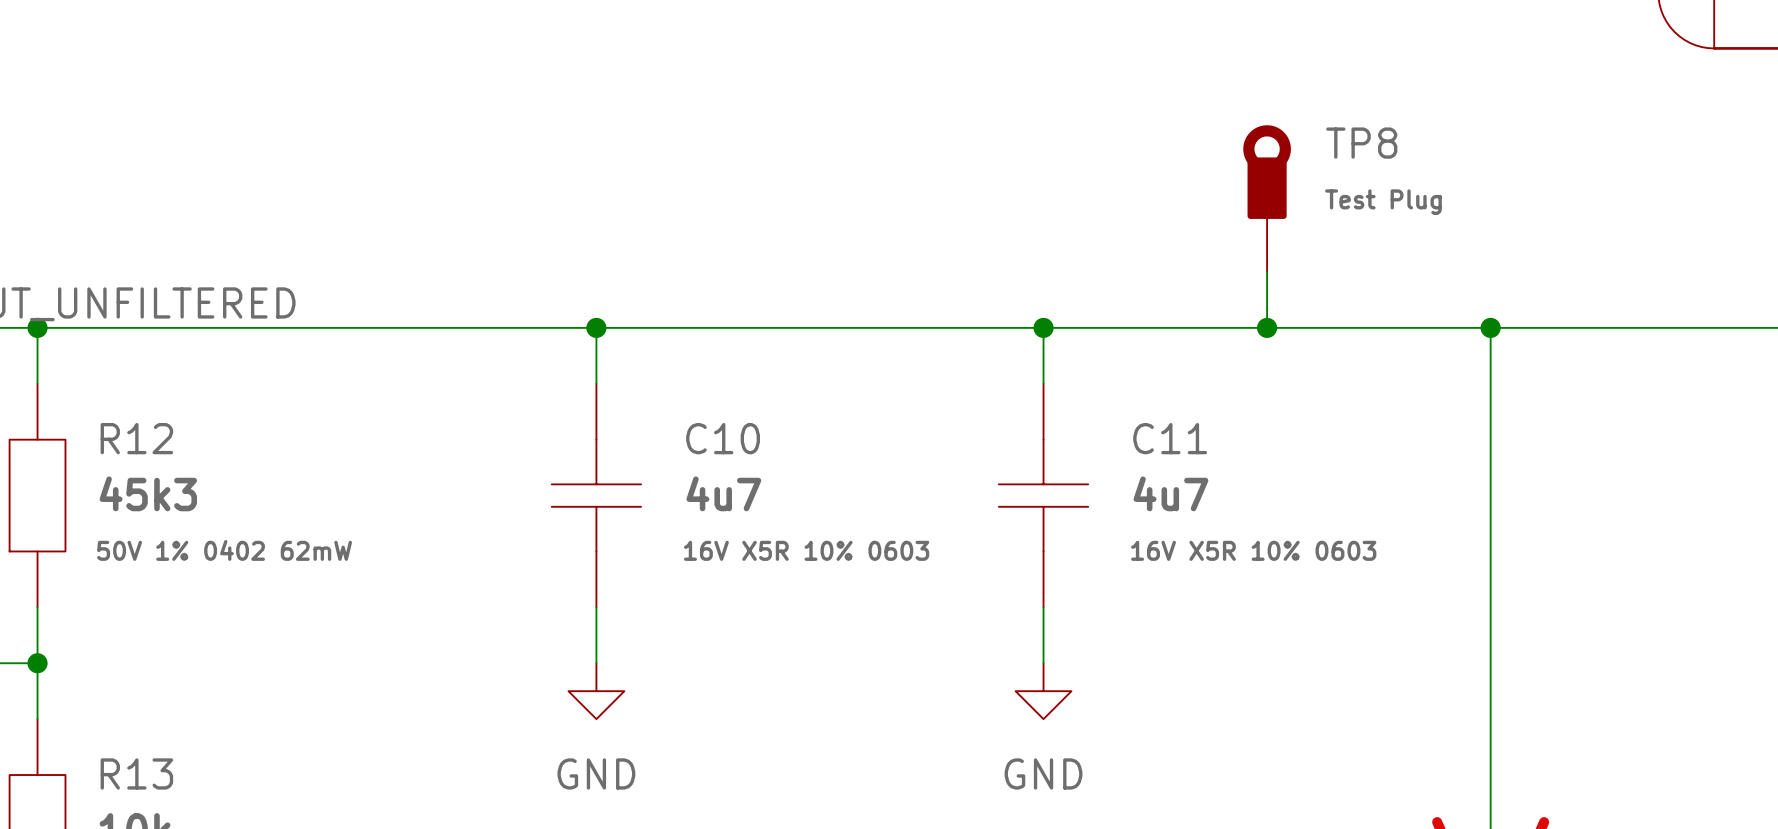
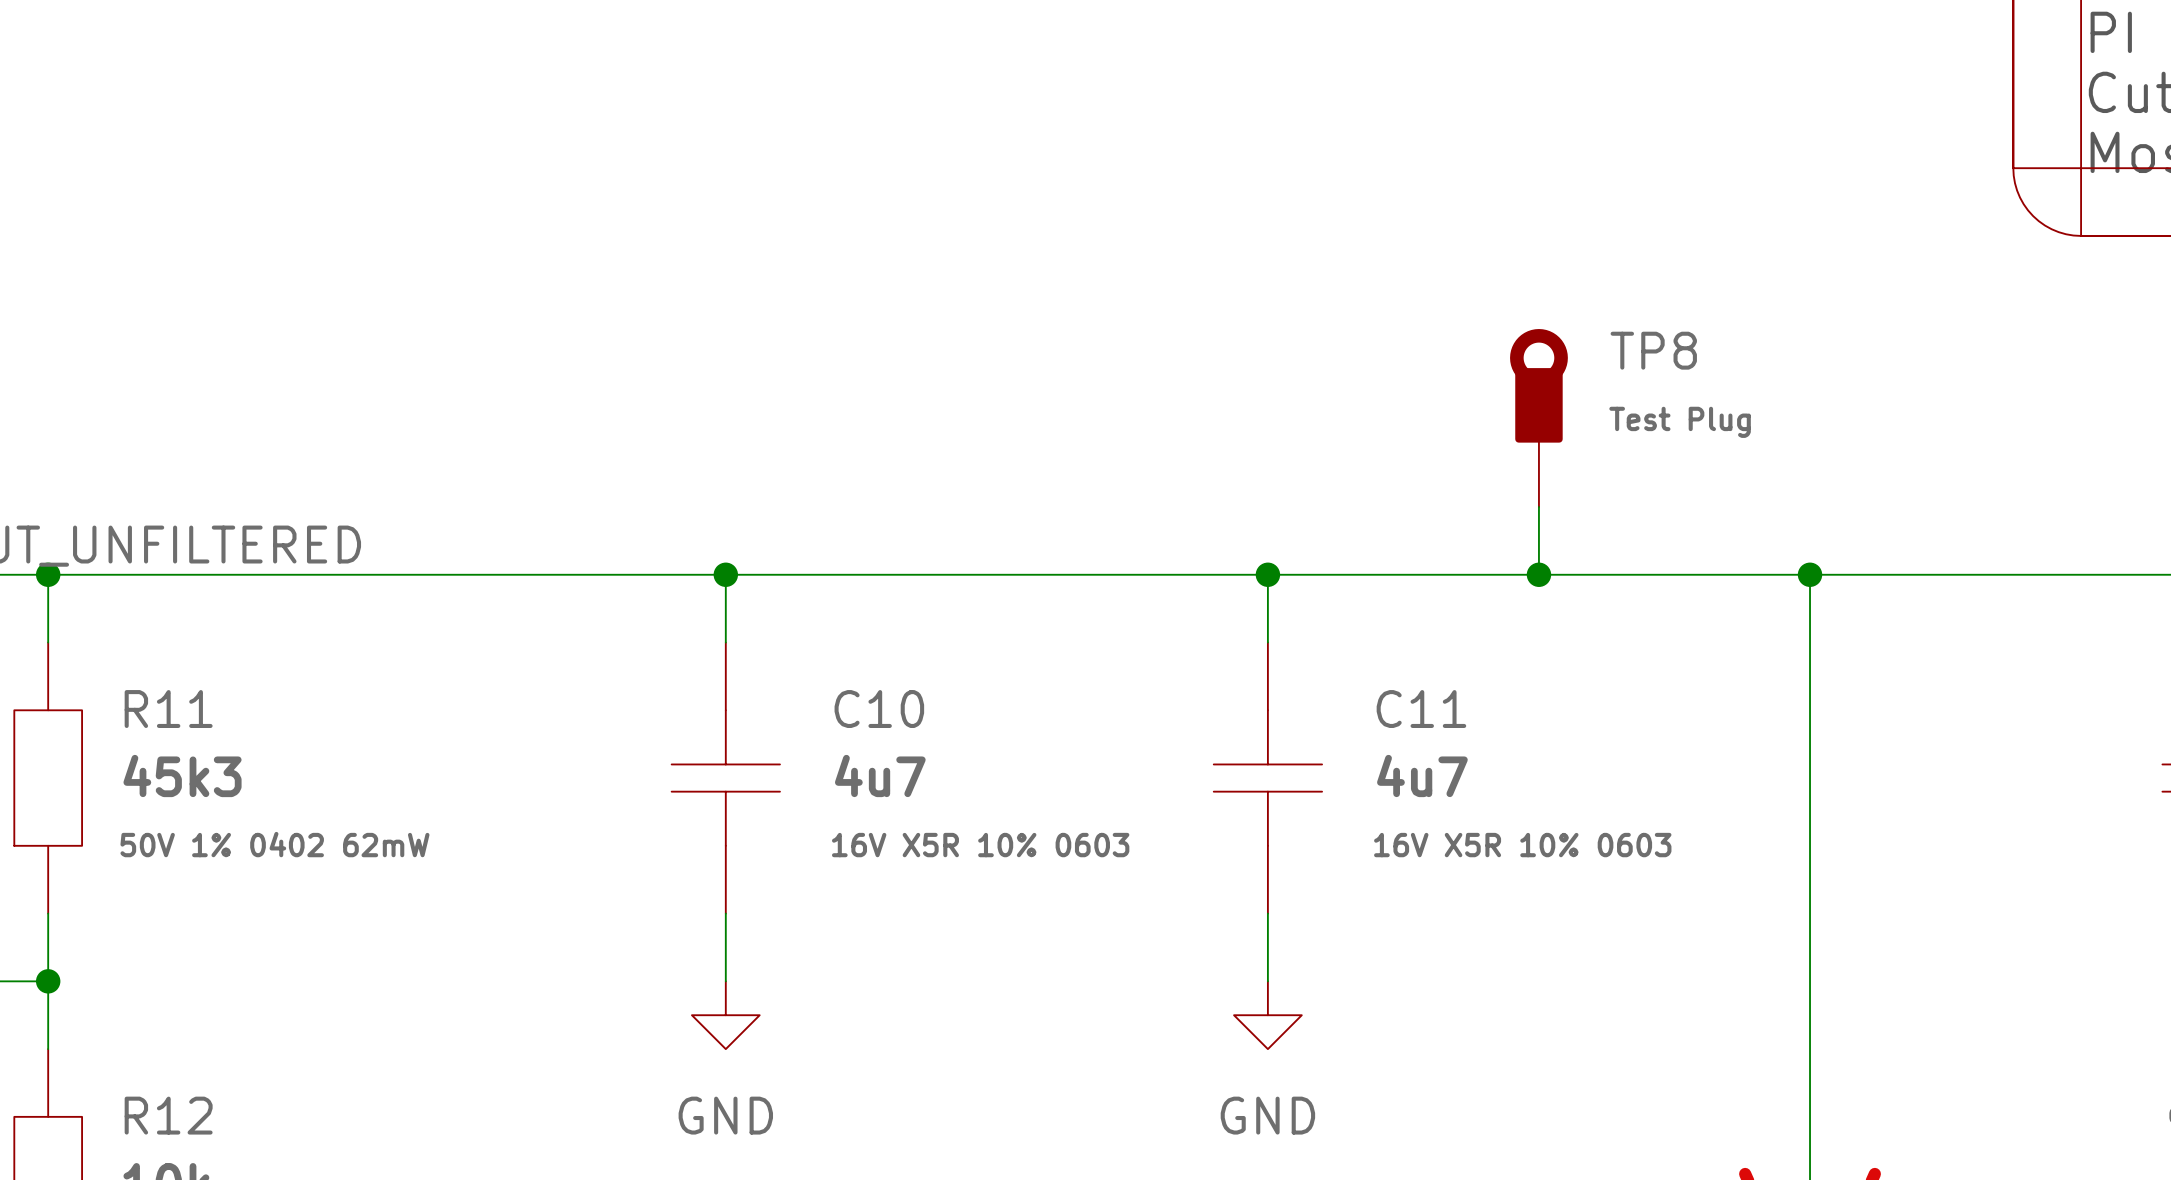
R12 name: R12 (136, 438) -> R11 (168, 709)
R13 name: R13 (136, 773) -> R12 (168, 1115)

